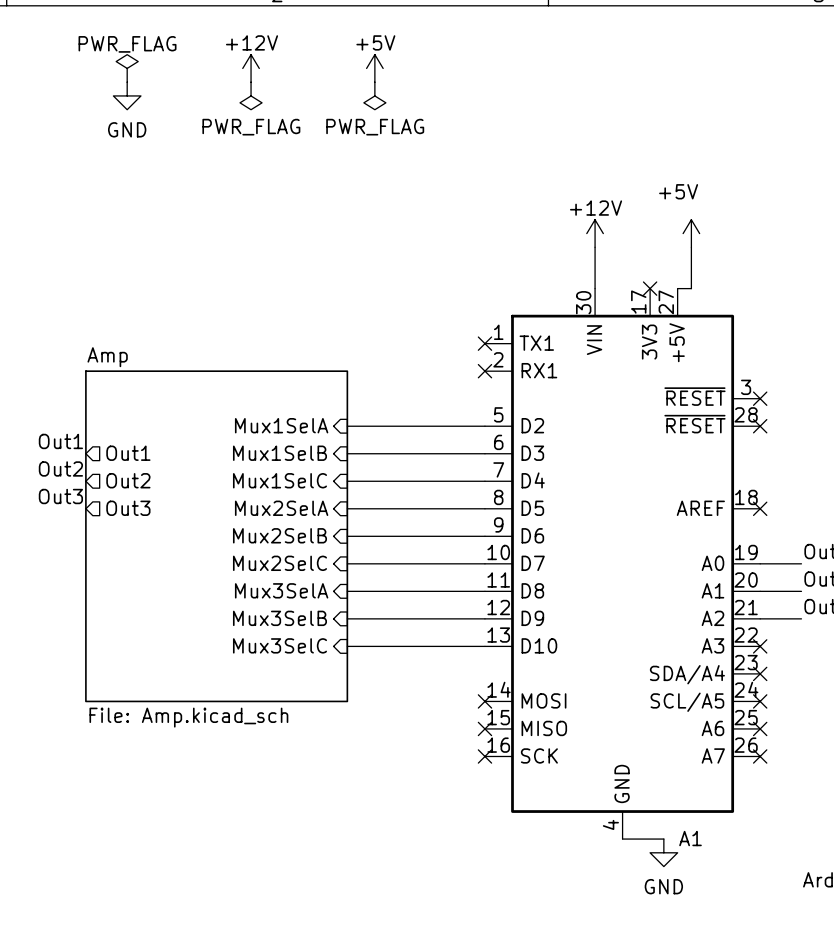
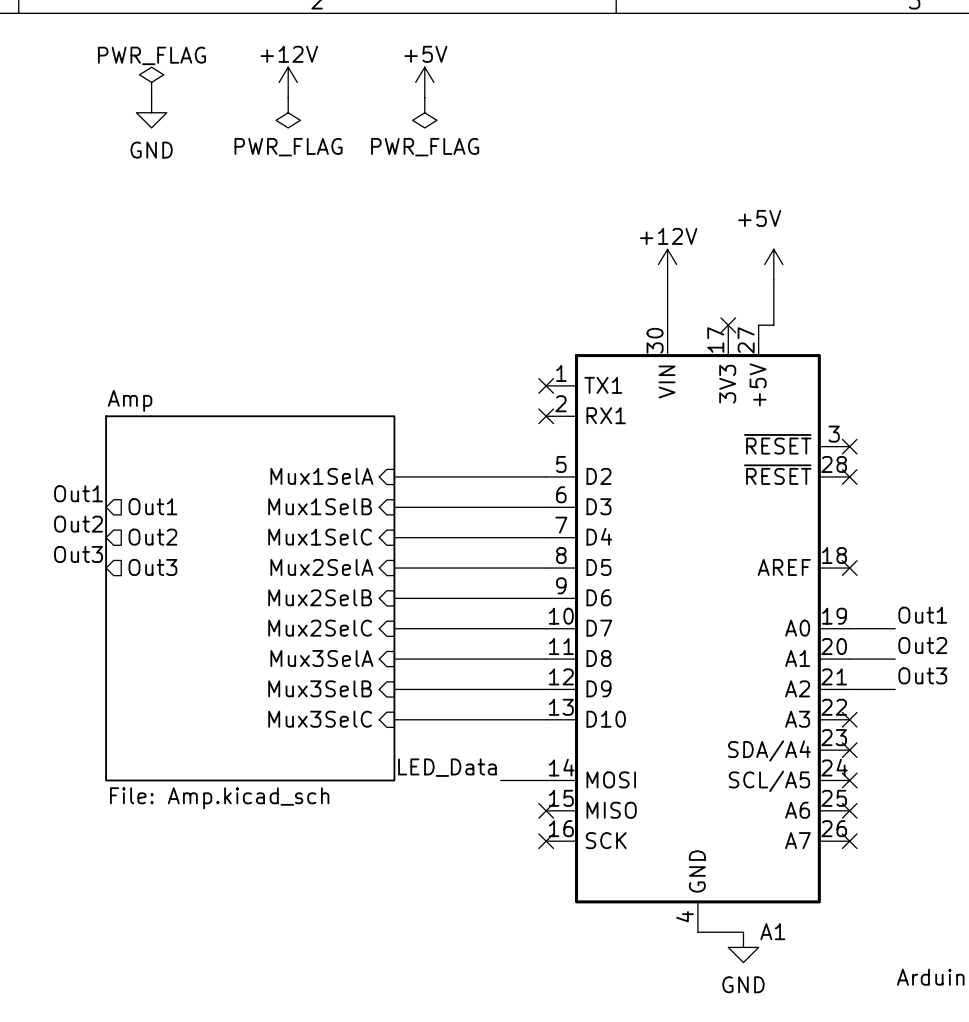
label: none -> LED_Data (447, 767)
wire: none -> (500, 780) (546, 780)
no-connect mark: (484, 701) -> none

